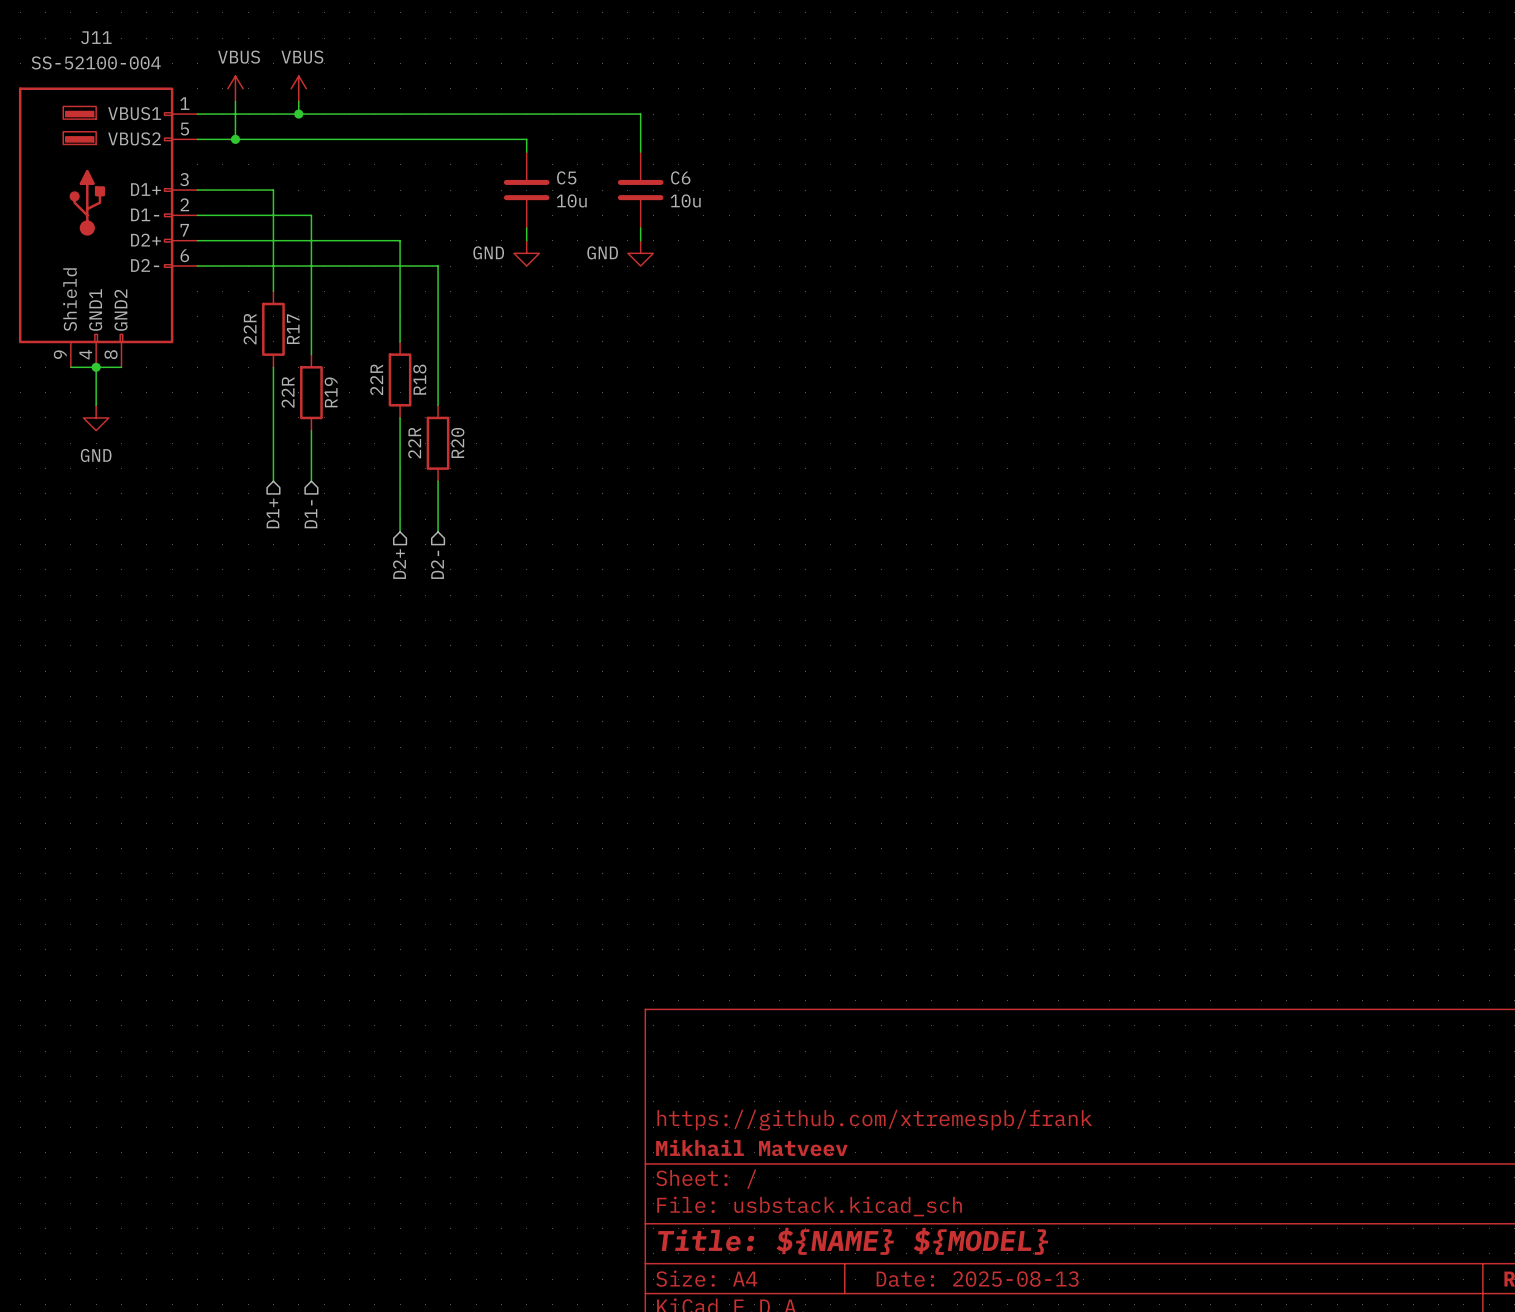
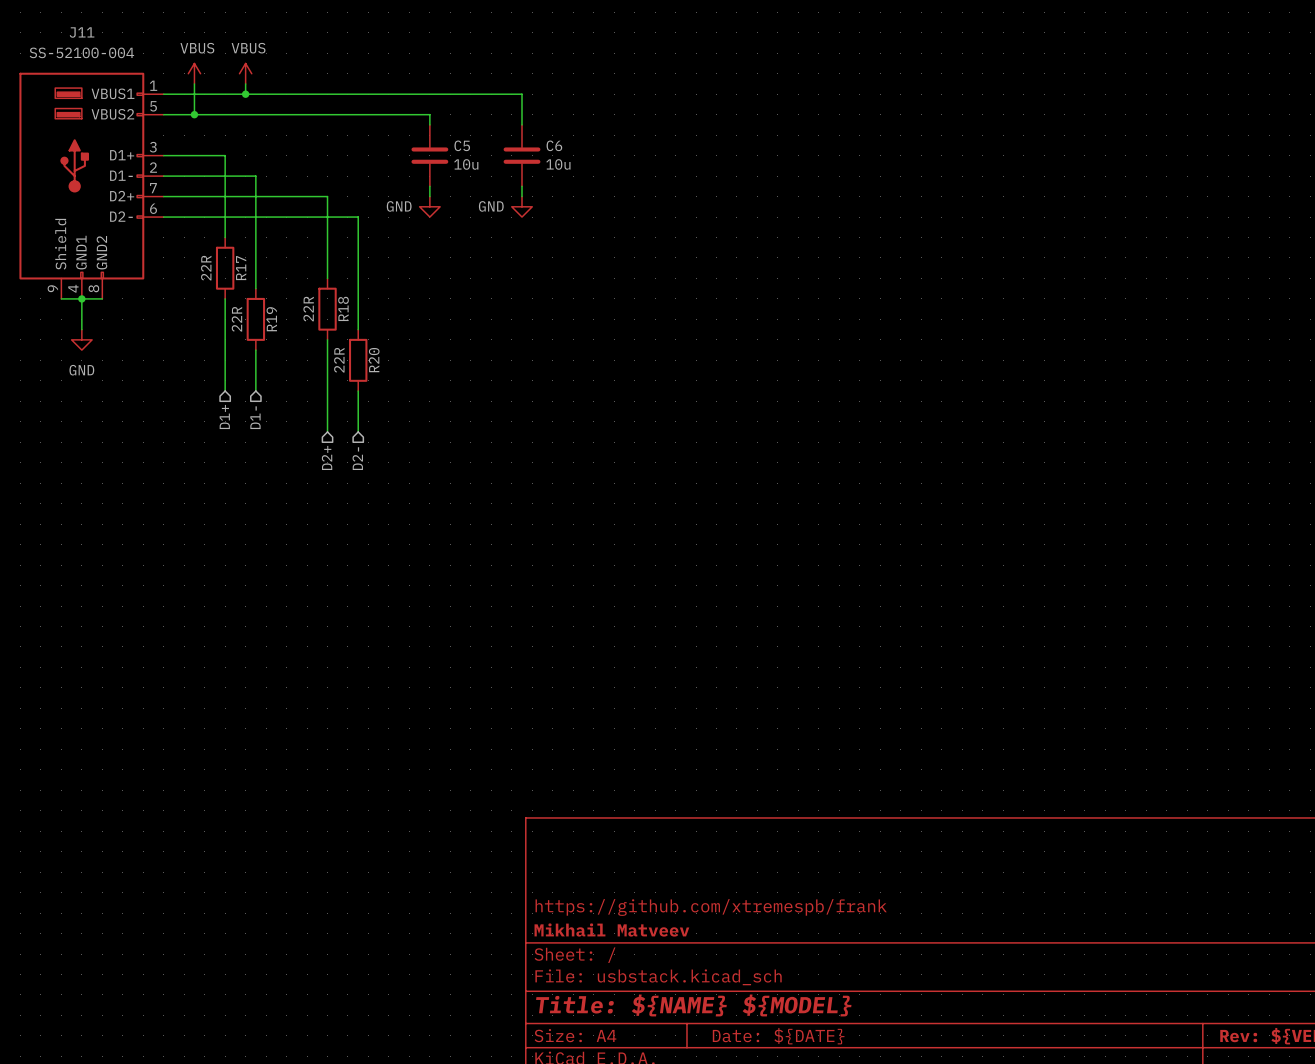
title block: Date: 2025-08-13 (977, 1279) -> Date: ${DATE} (778, 1036)

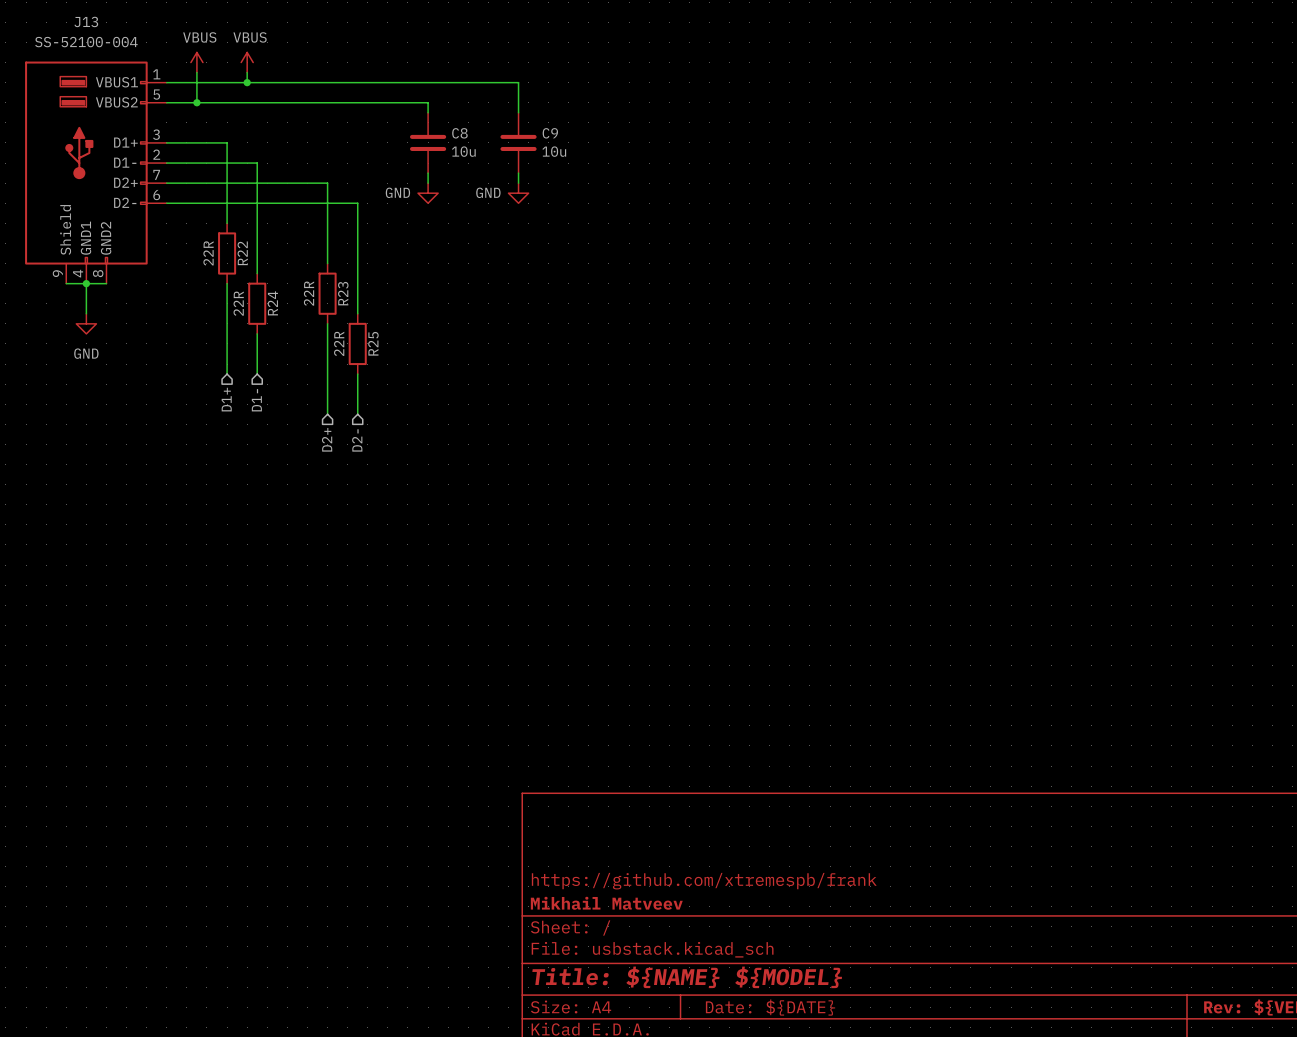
J11 name: J11 (82, 32) -> J13 (86, 21)
C5 name: C5 (462, 145) -> C8 (459, 133)
C6 name: C6 (554, 145) -> C9 (550, 133)
R17 name: R17 (241, 268) -> R22 (242, 253)
R18 name: R18 (343, 308) -> R23 (343, 293)
R19 name: R19 (271, 319) -> R24 (272, 303)
R20 name: R20 (374, 360) -> R25 (373, 343)

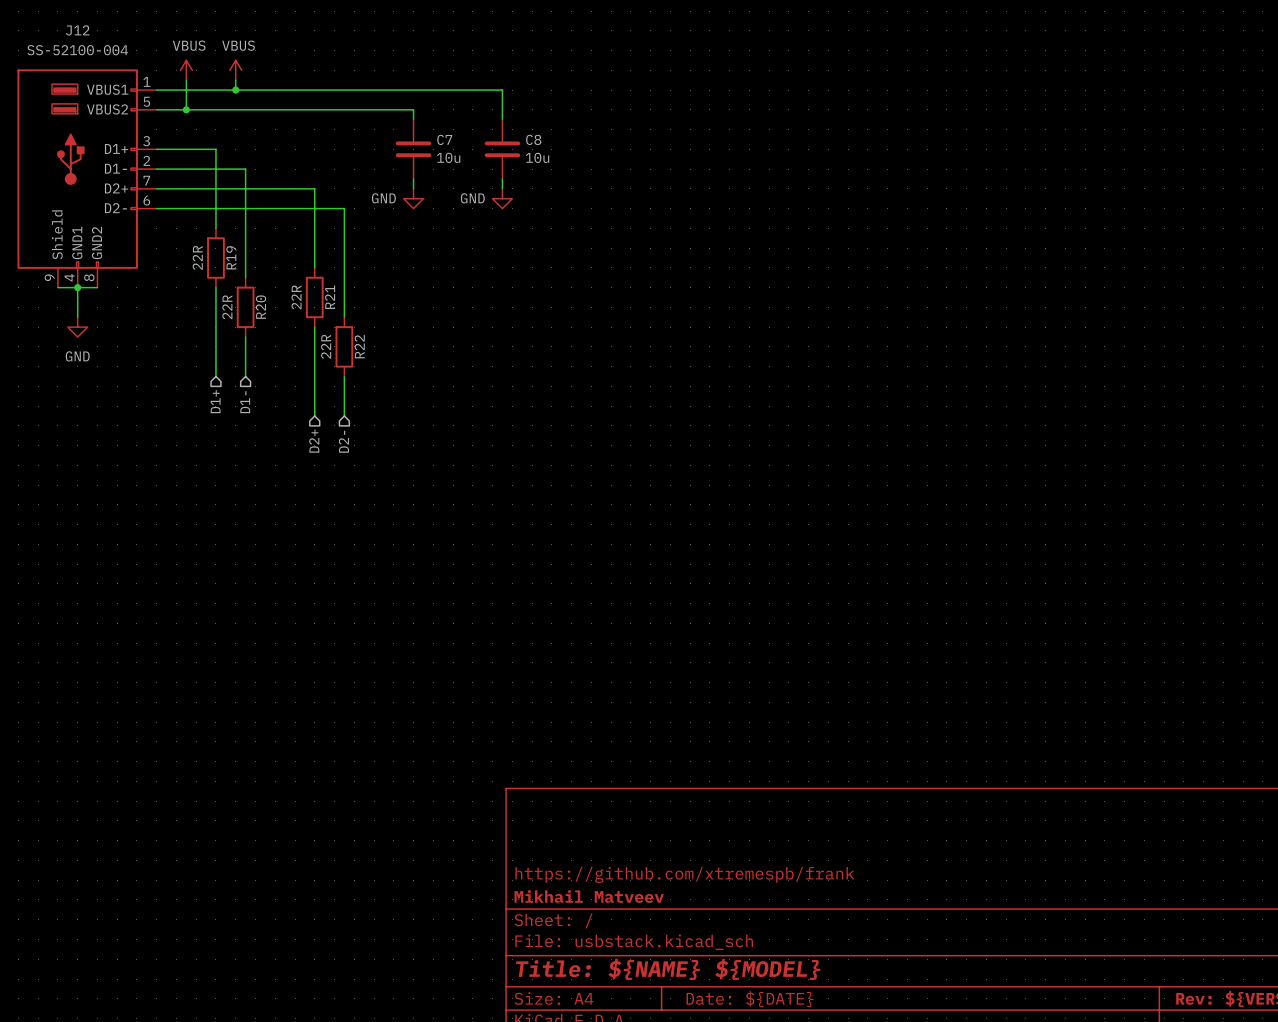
J13 name: J13 (86, 21) -> J12 (77, 30)
C8 name: C8 (459, 133) -> C7 (444, 139)
C9 name: C9 (550, 133) -> C8 (533, 139)
R22 name: R22 (242, 253) -> R19 (231, 257)
R23 name: R23 (343, 293) -> R21 (330, 297)
R24 name: R24 (272, 303) -> R20 (261, 307)
R25 name: R25 (373, 343) -> R22 (359, 346)

